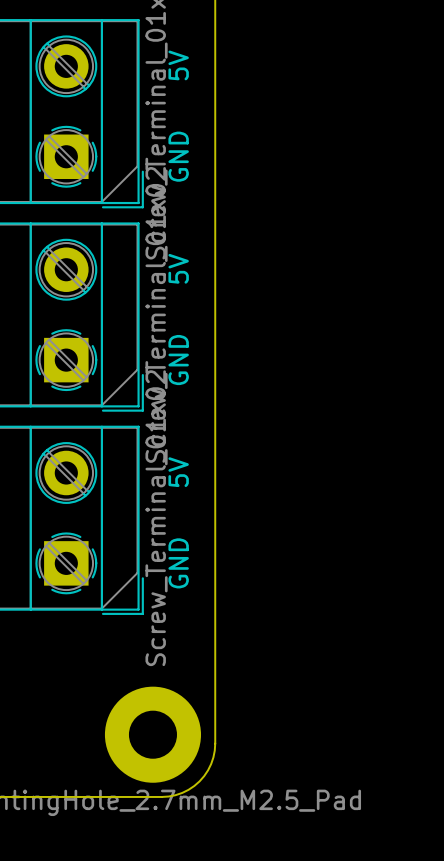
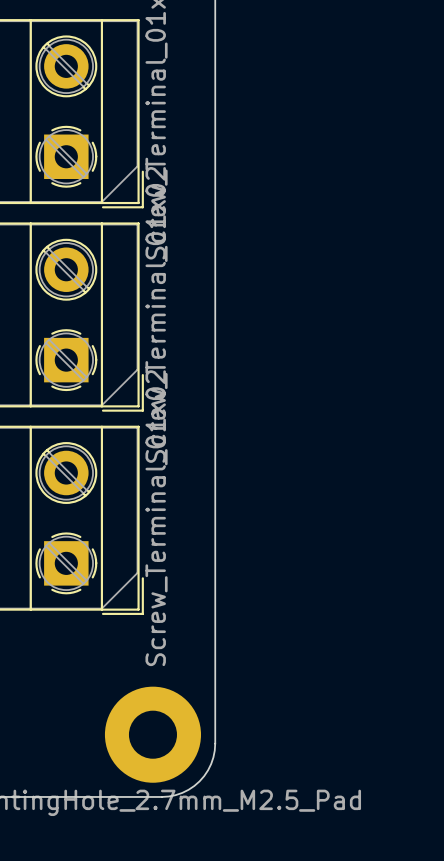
text: 5V (178, 65) -> none
text: GND (178, 156) -> none
text: 5V (178, 268) -> none
text: GND (178, 360) -> none
text: 5V (178, 472) -> none
text: GND (178, 563) -> none

